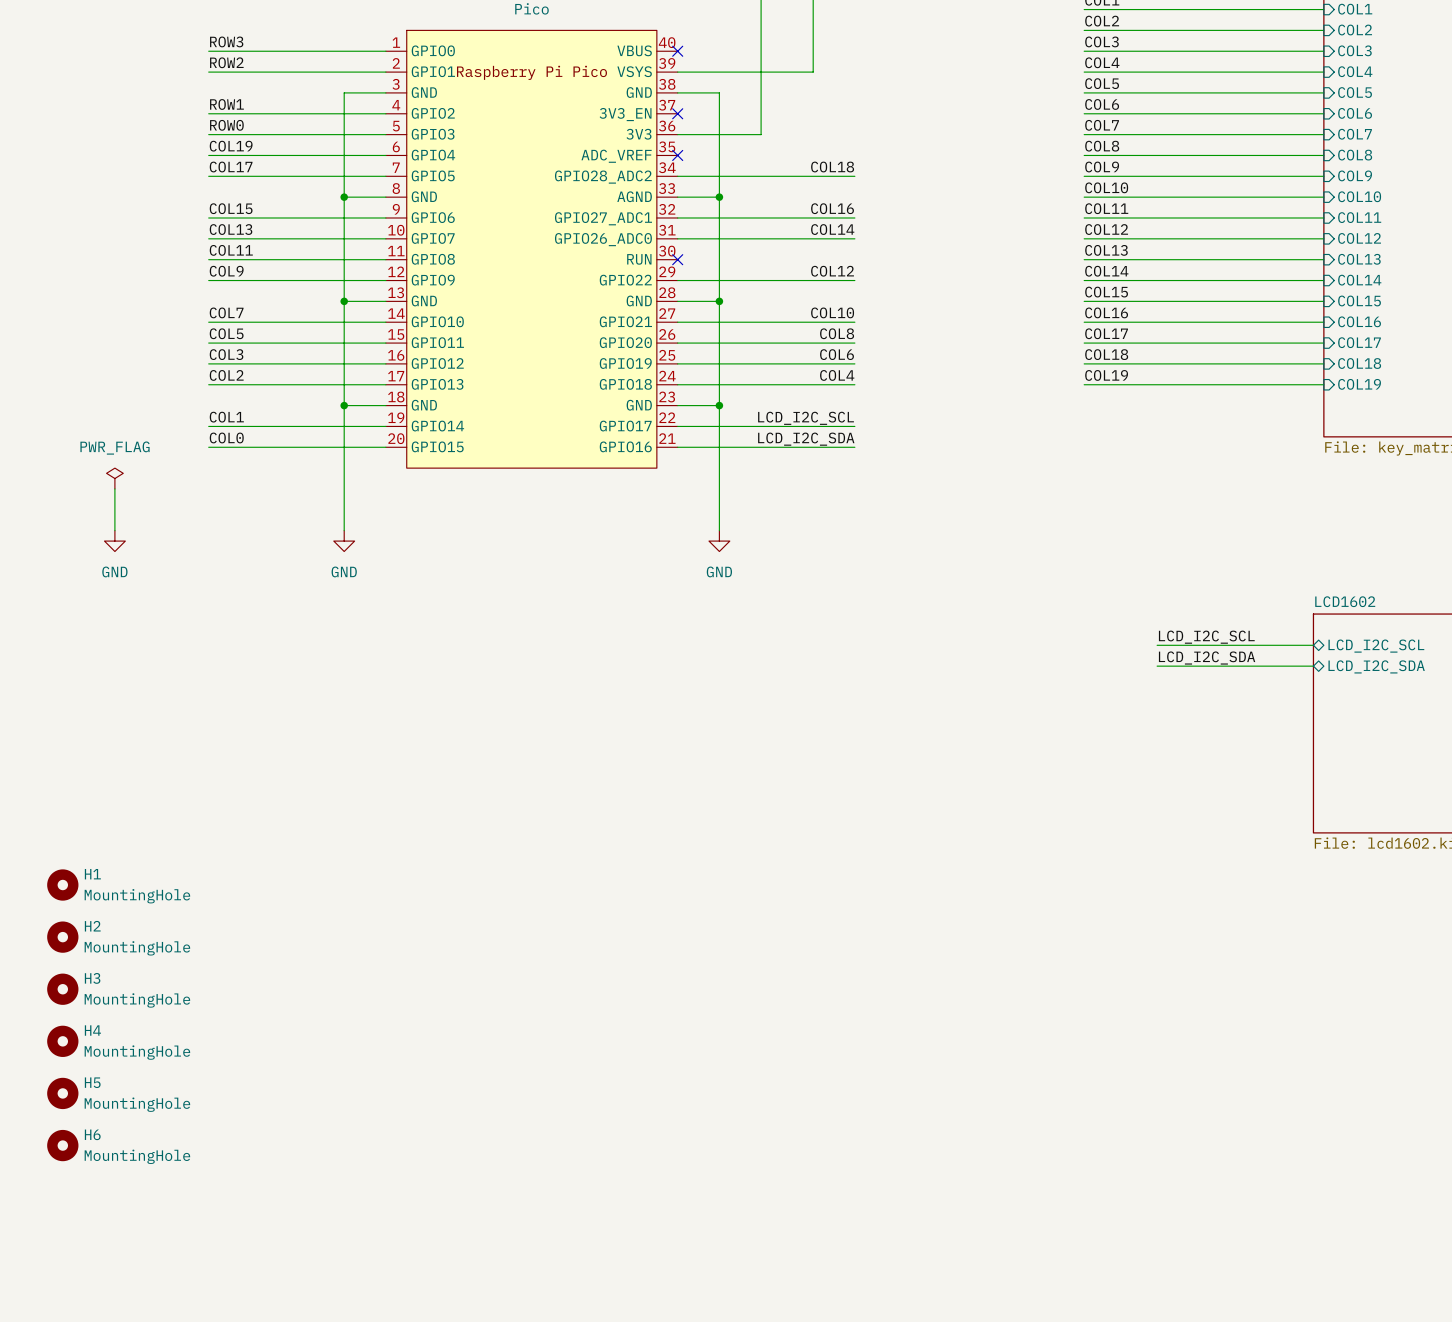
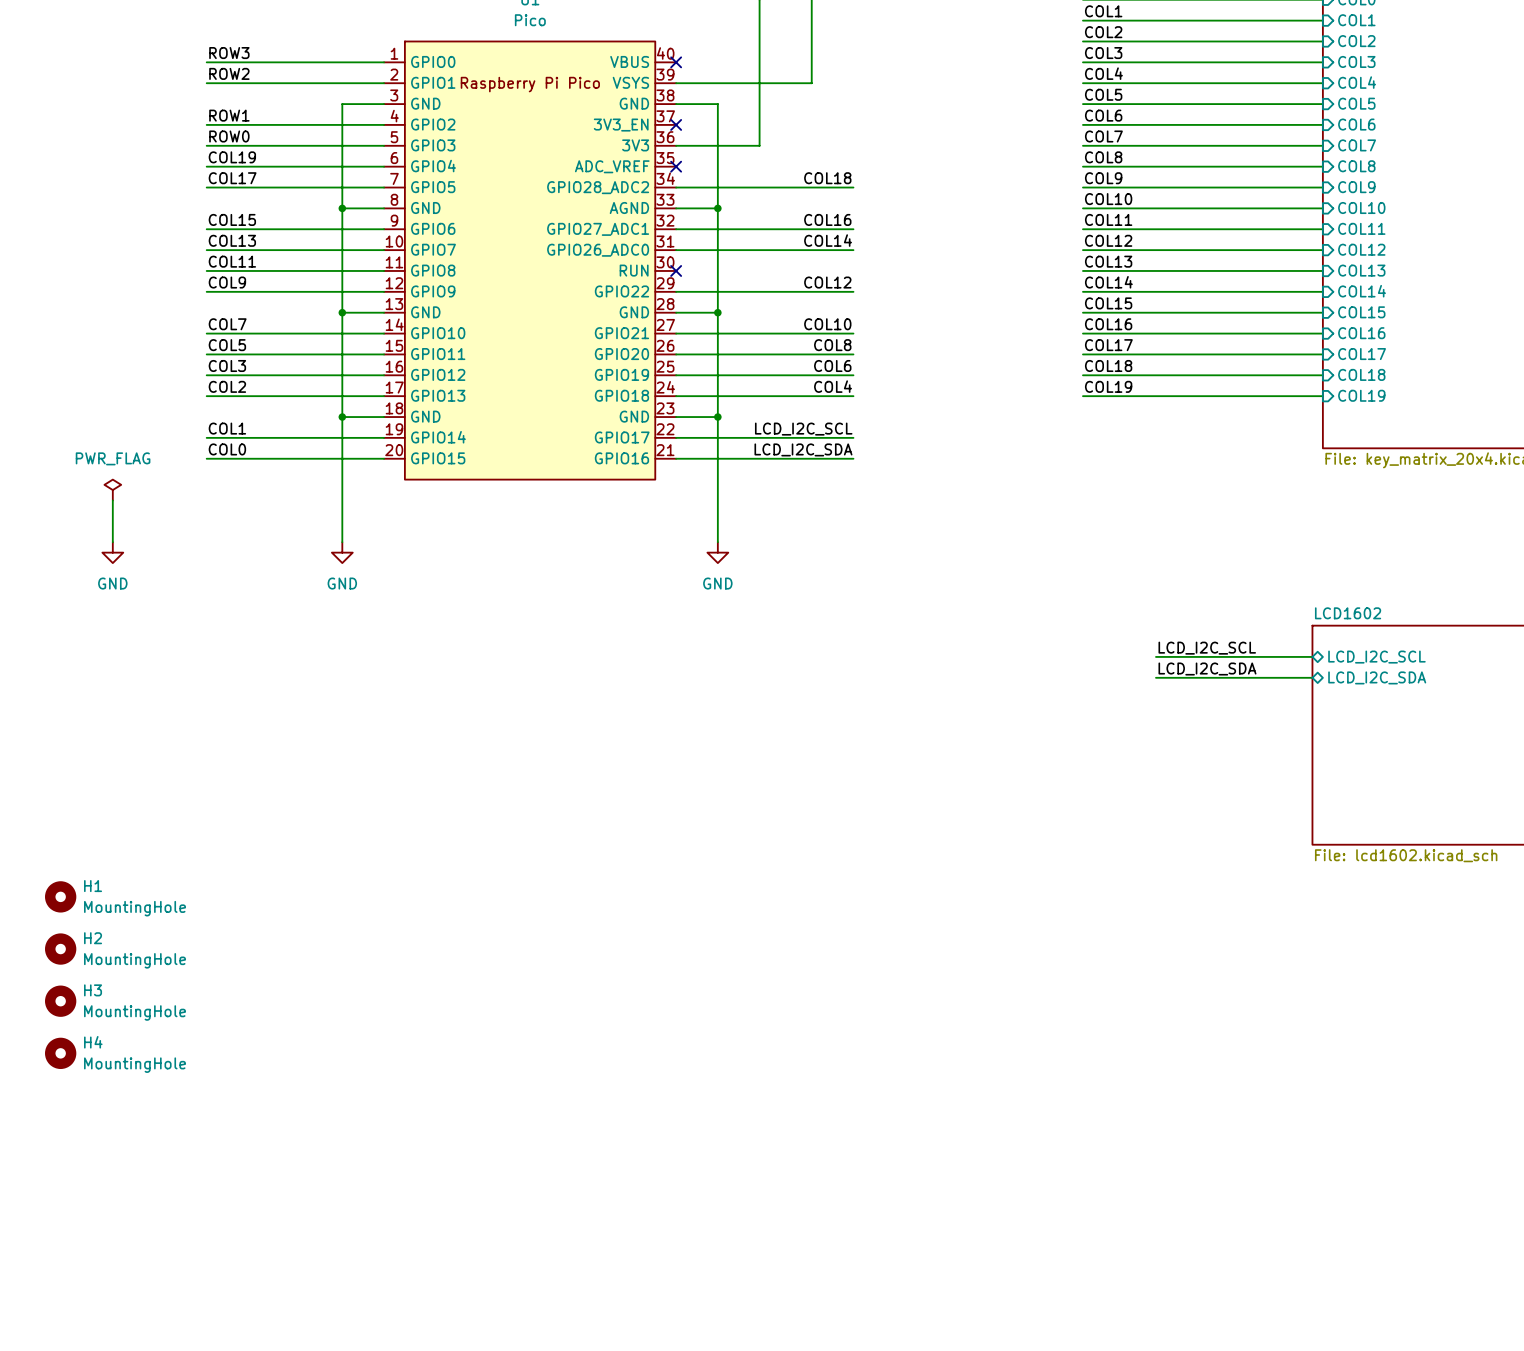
H5: MountingHole (62, 1093) -> none
H6: MountingHole (62, 1145) -> none

